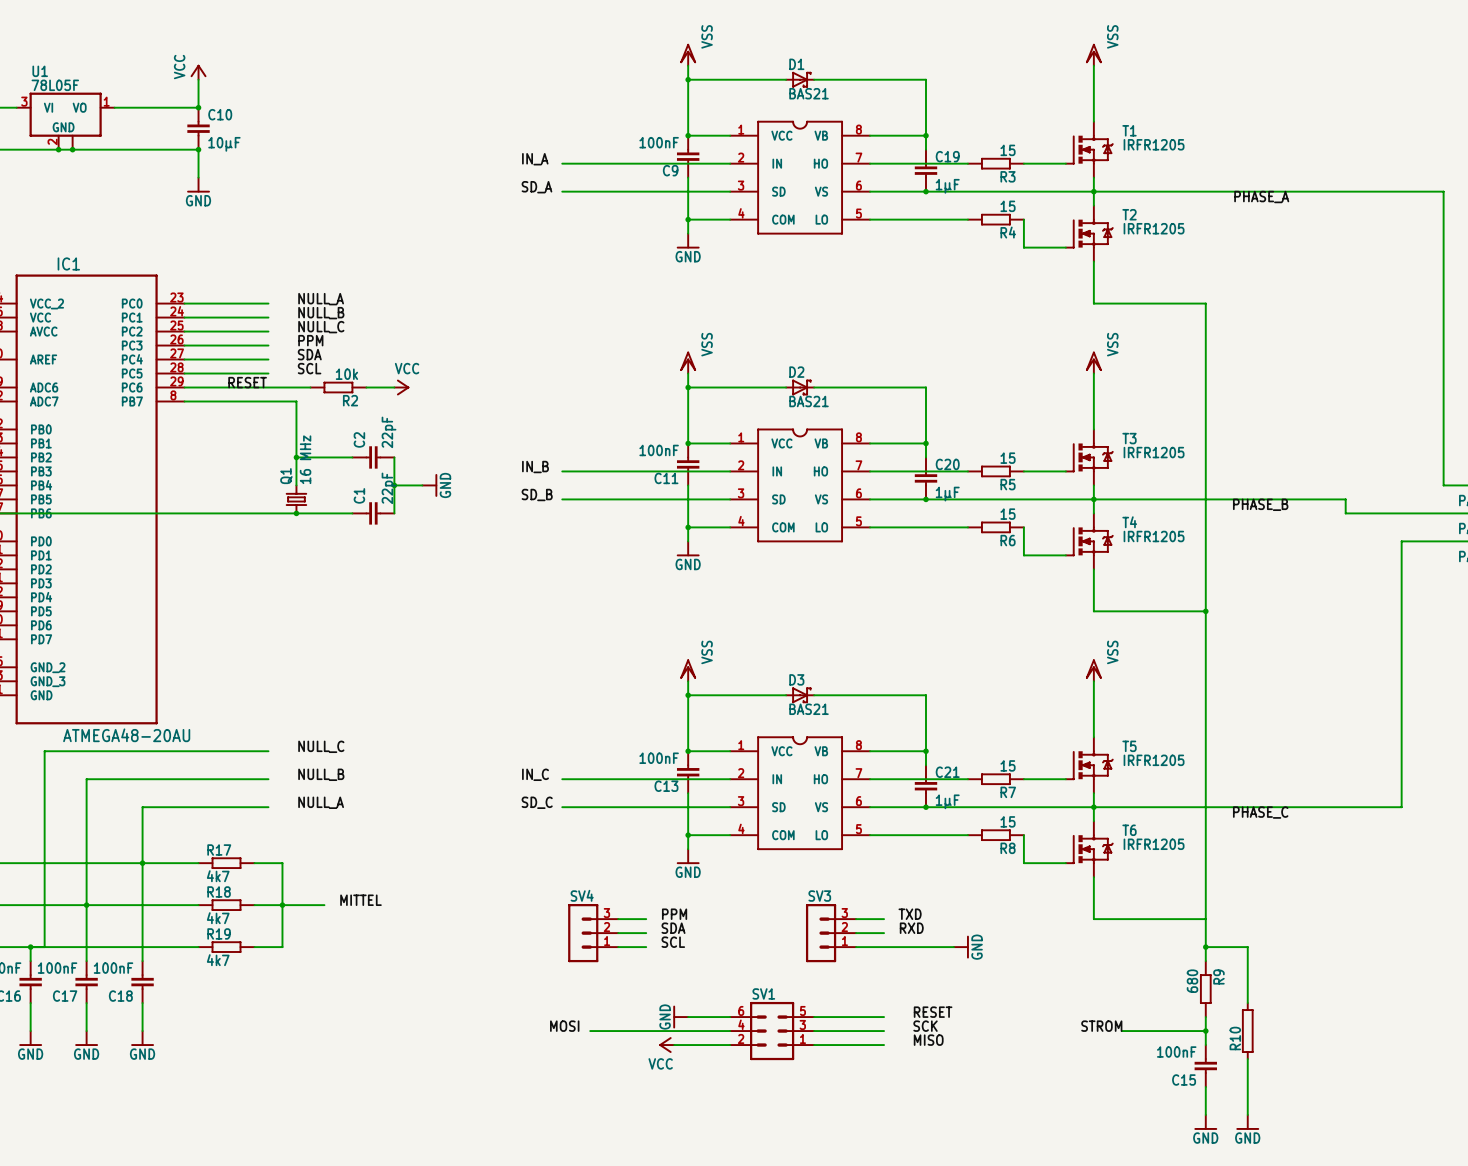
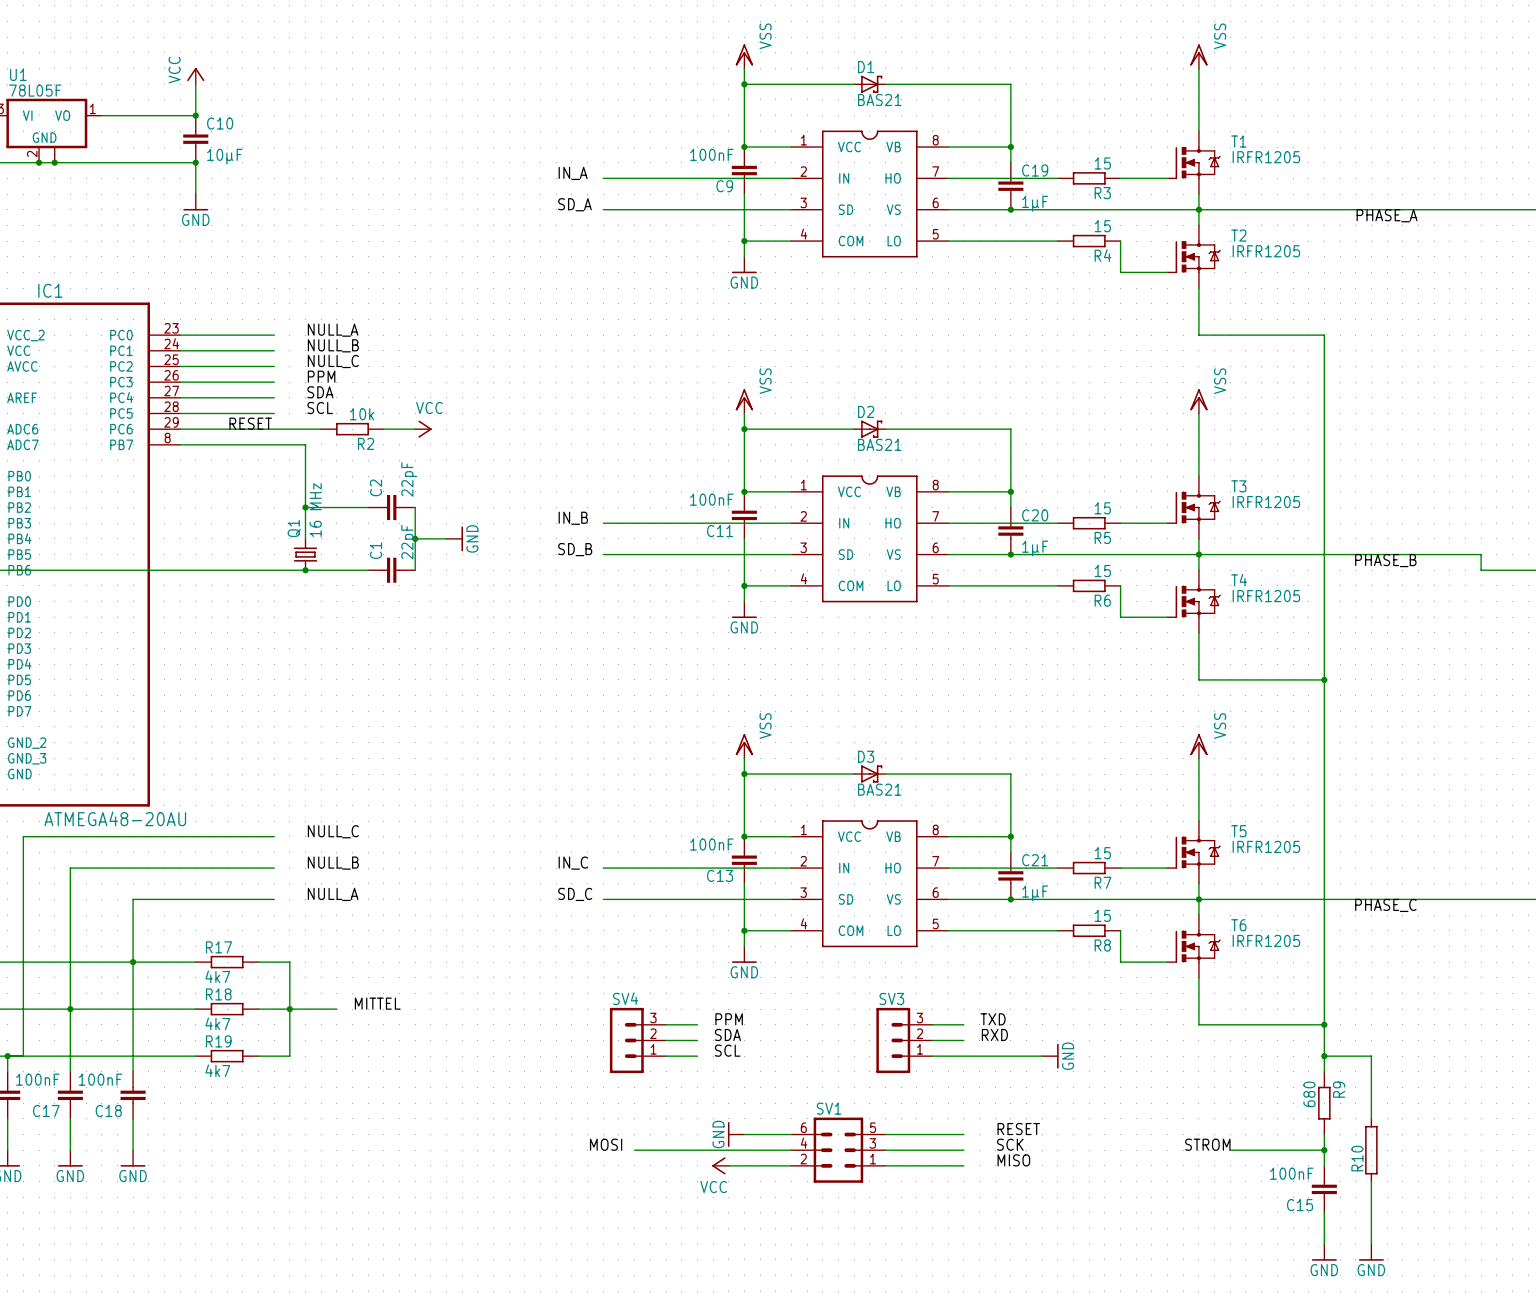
junction: none -> (1324, 1024)

